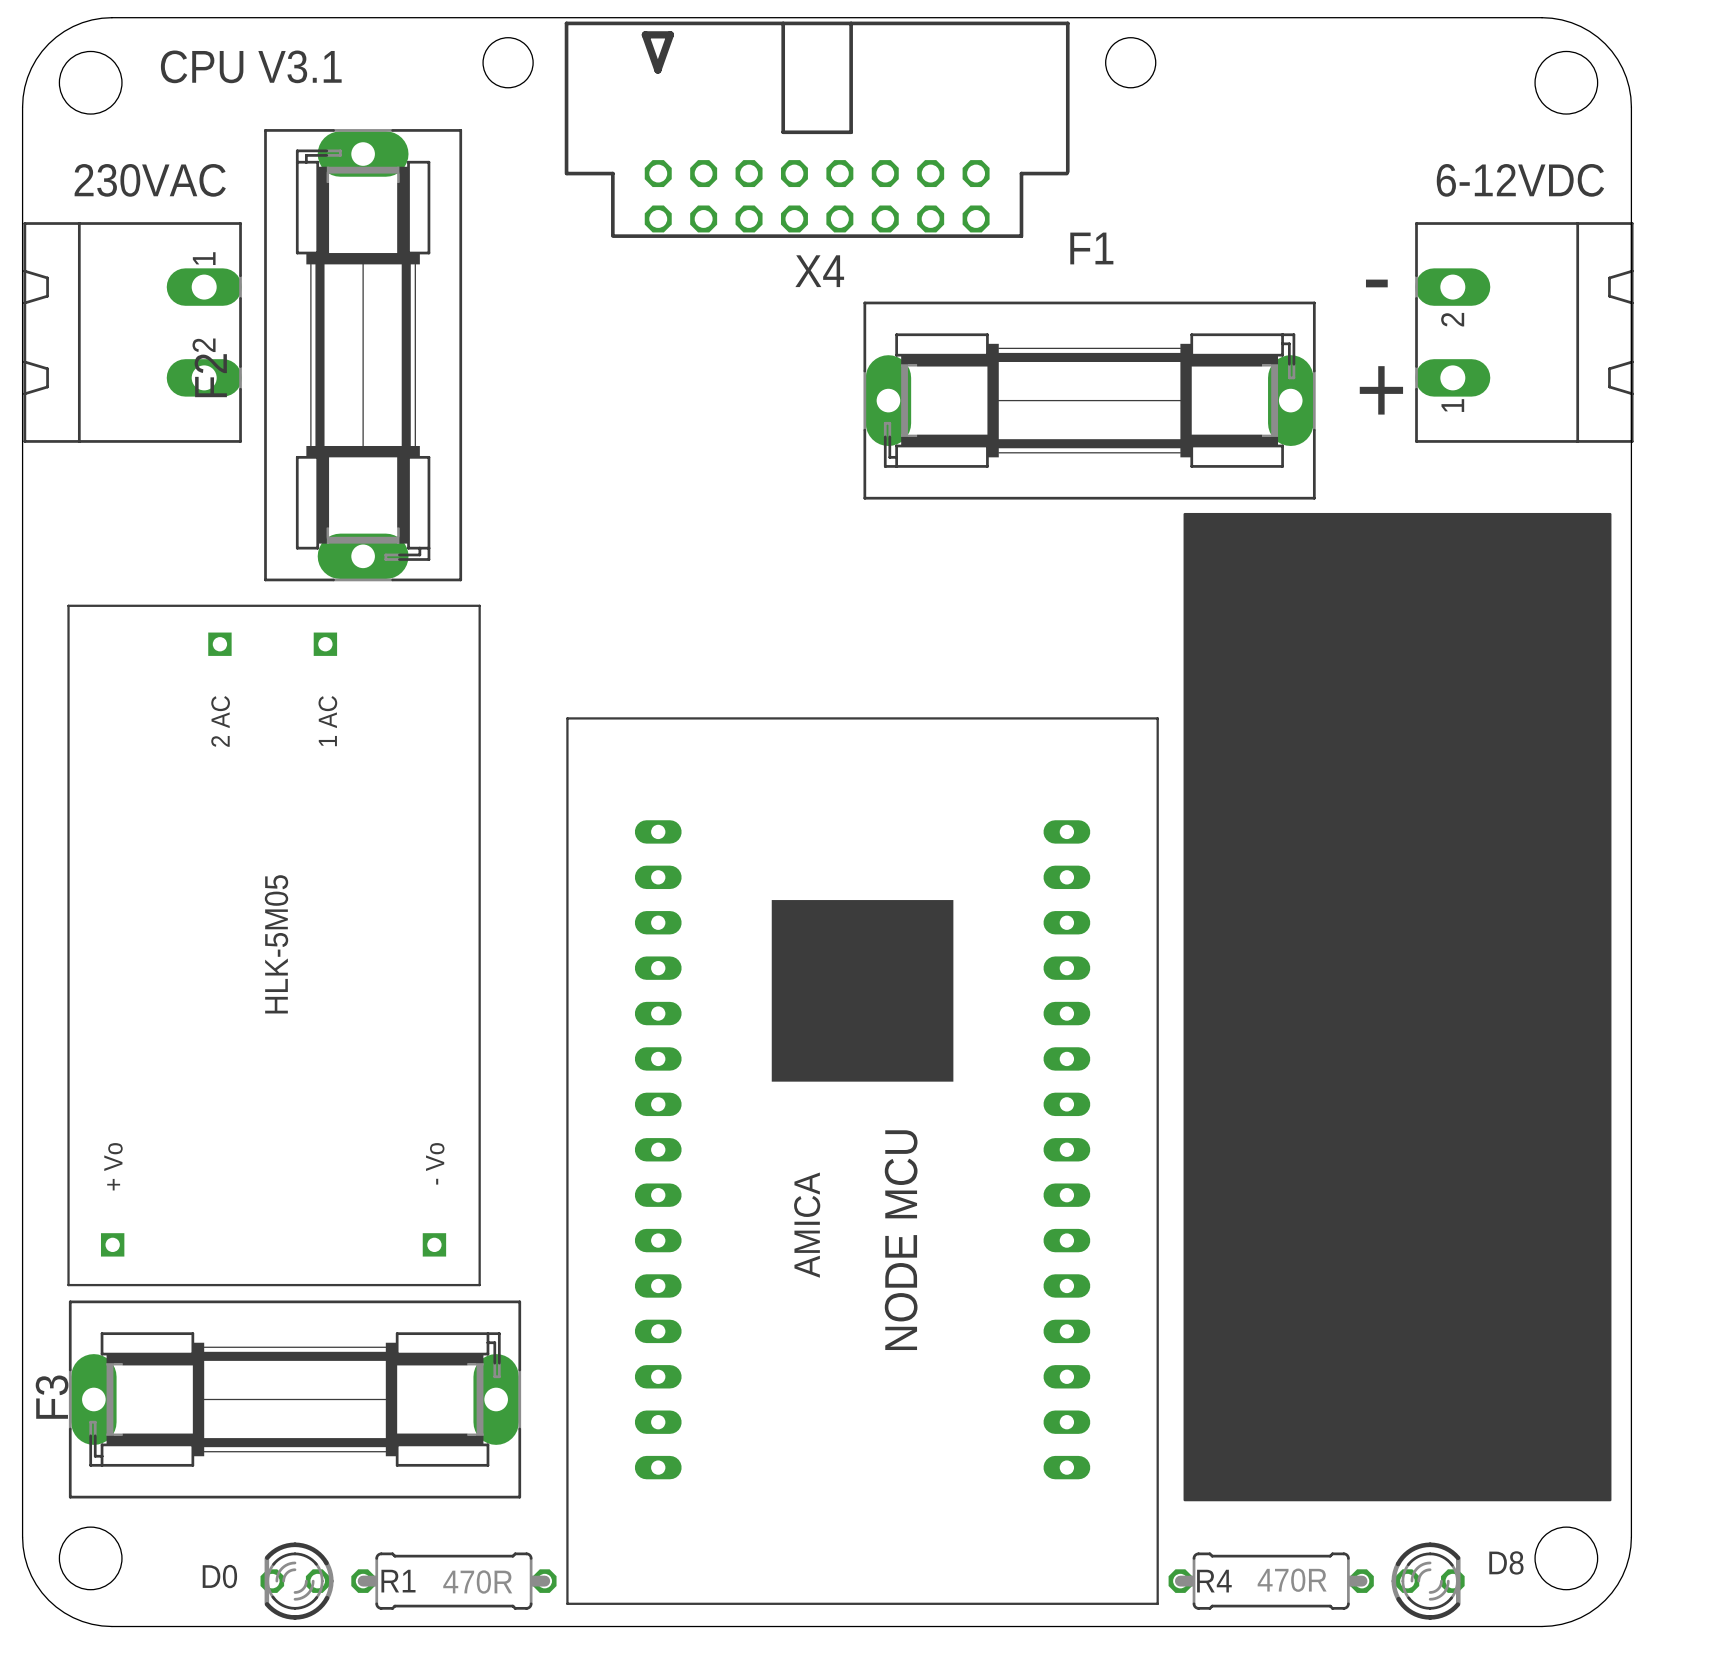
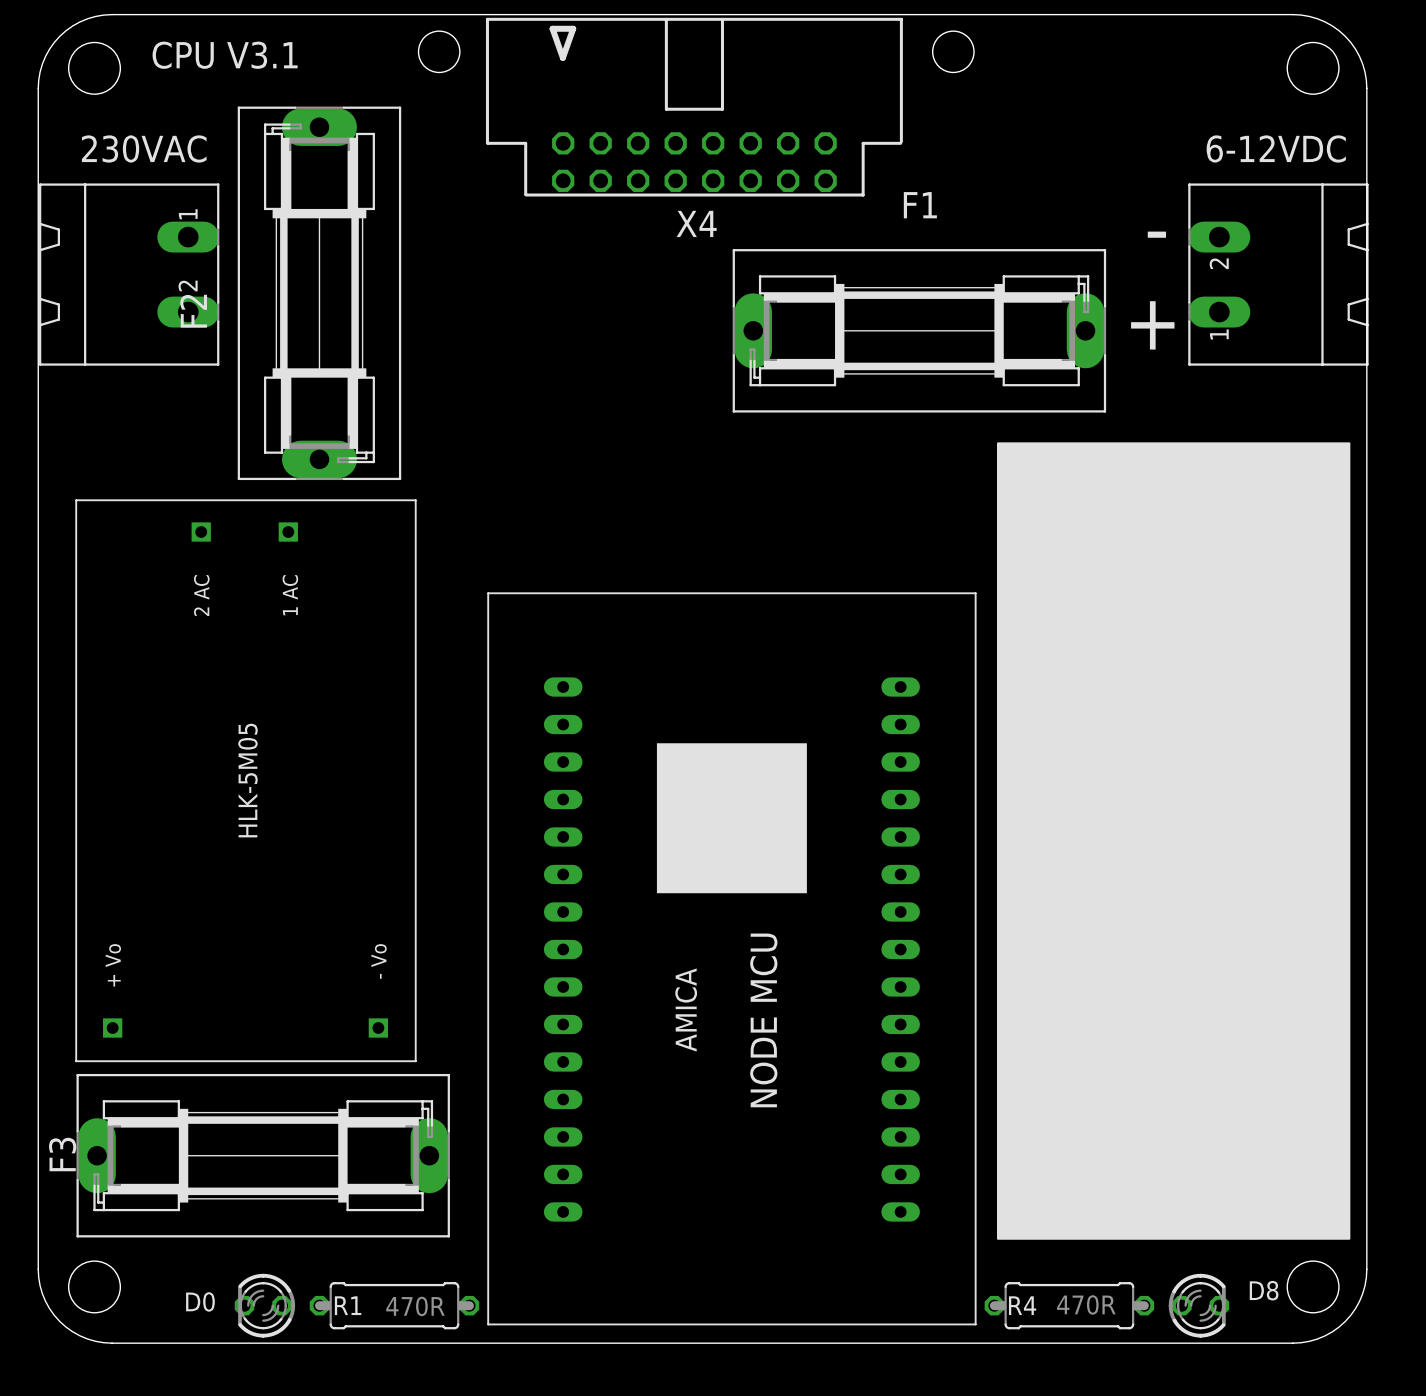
part footprint: [1183, 512, 1612, 1502] -> [996, 442, 1351, 1240]

